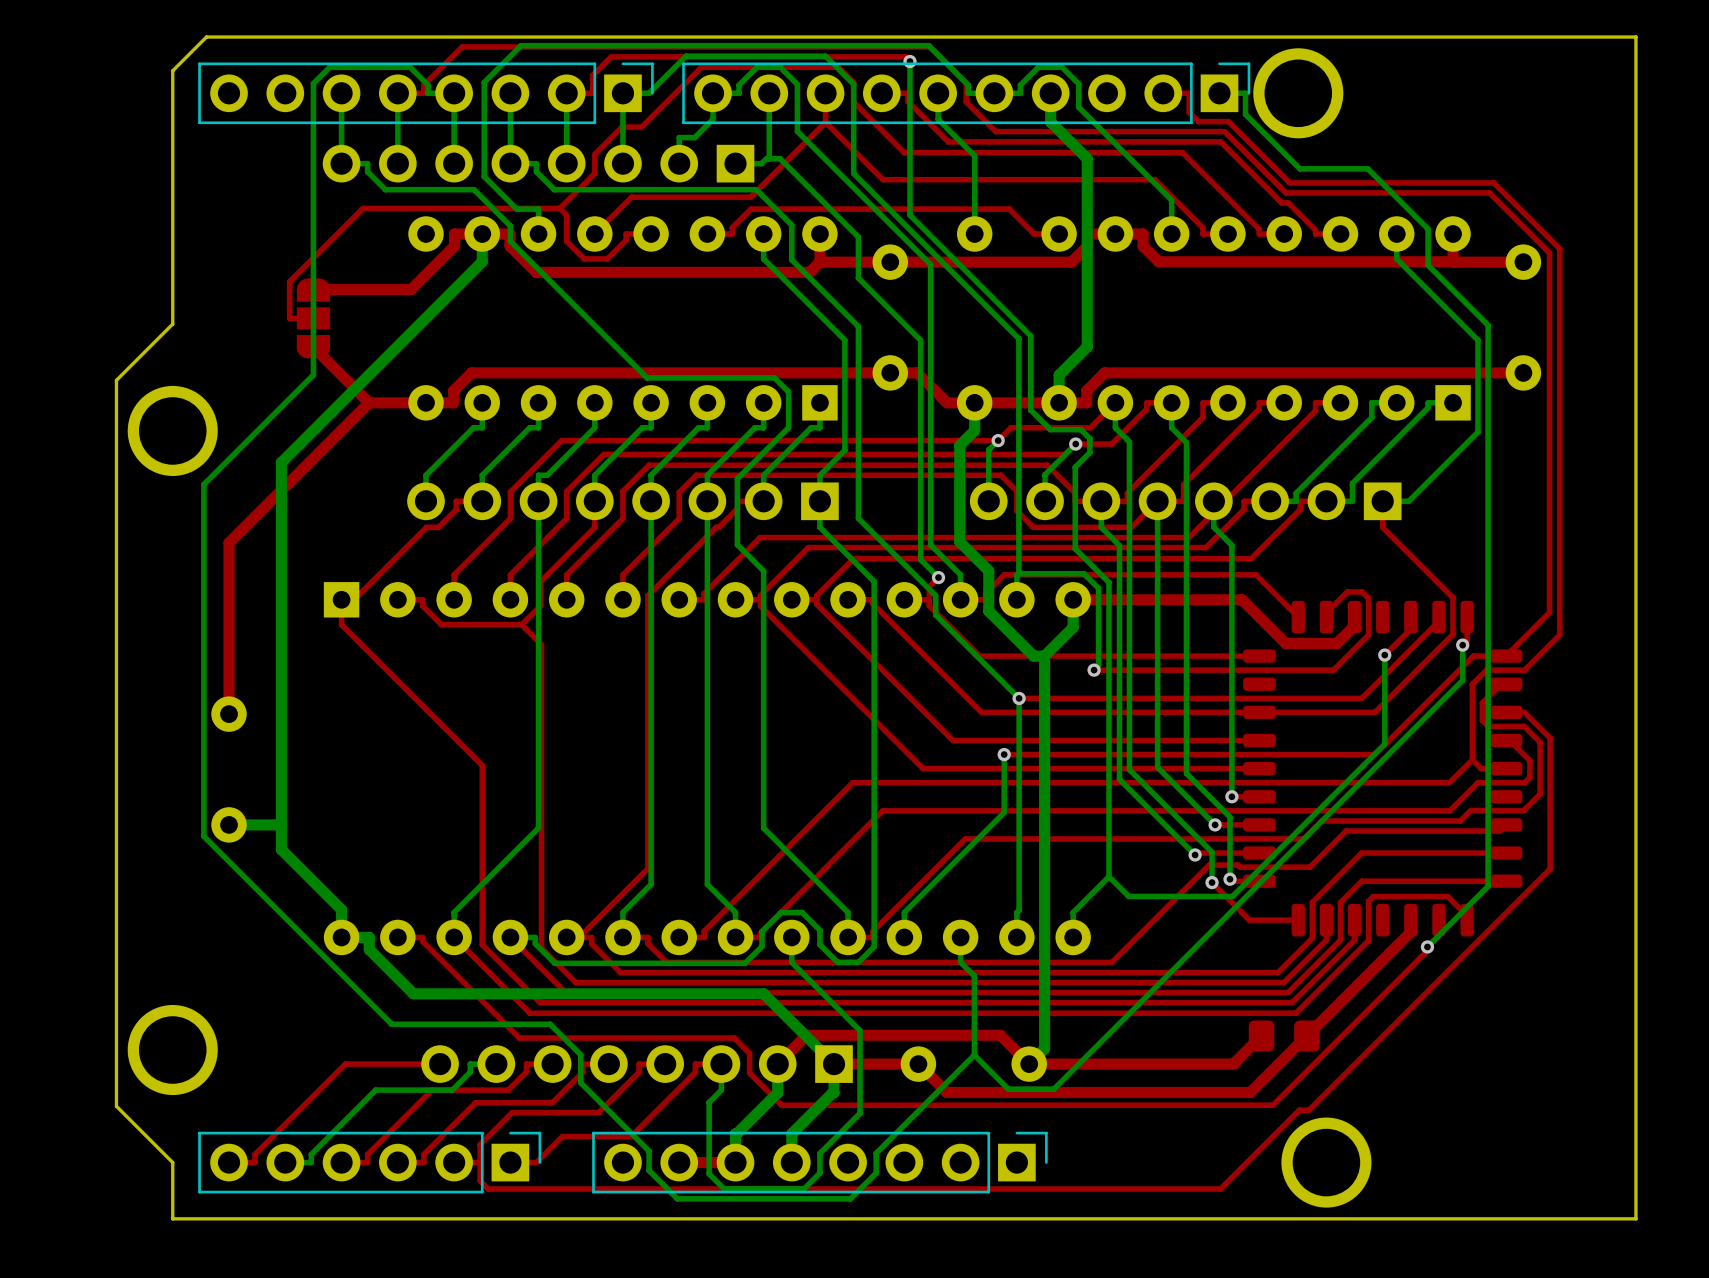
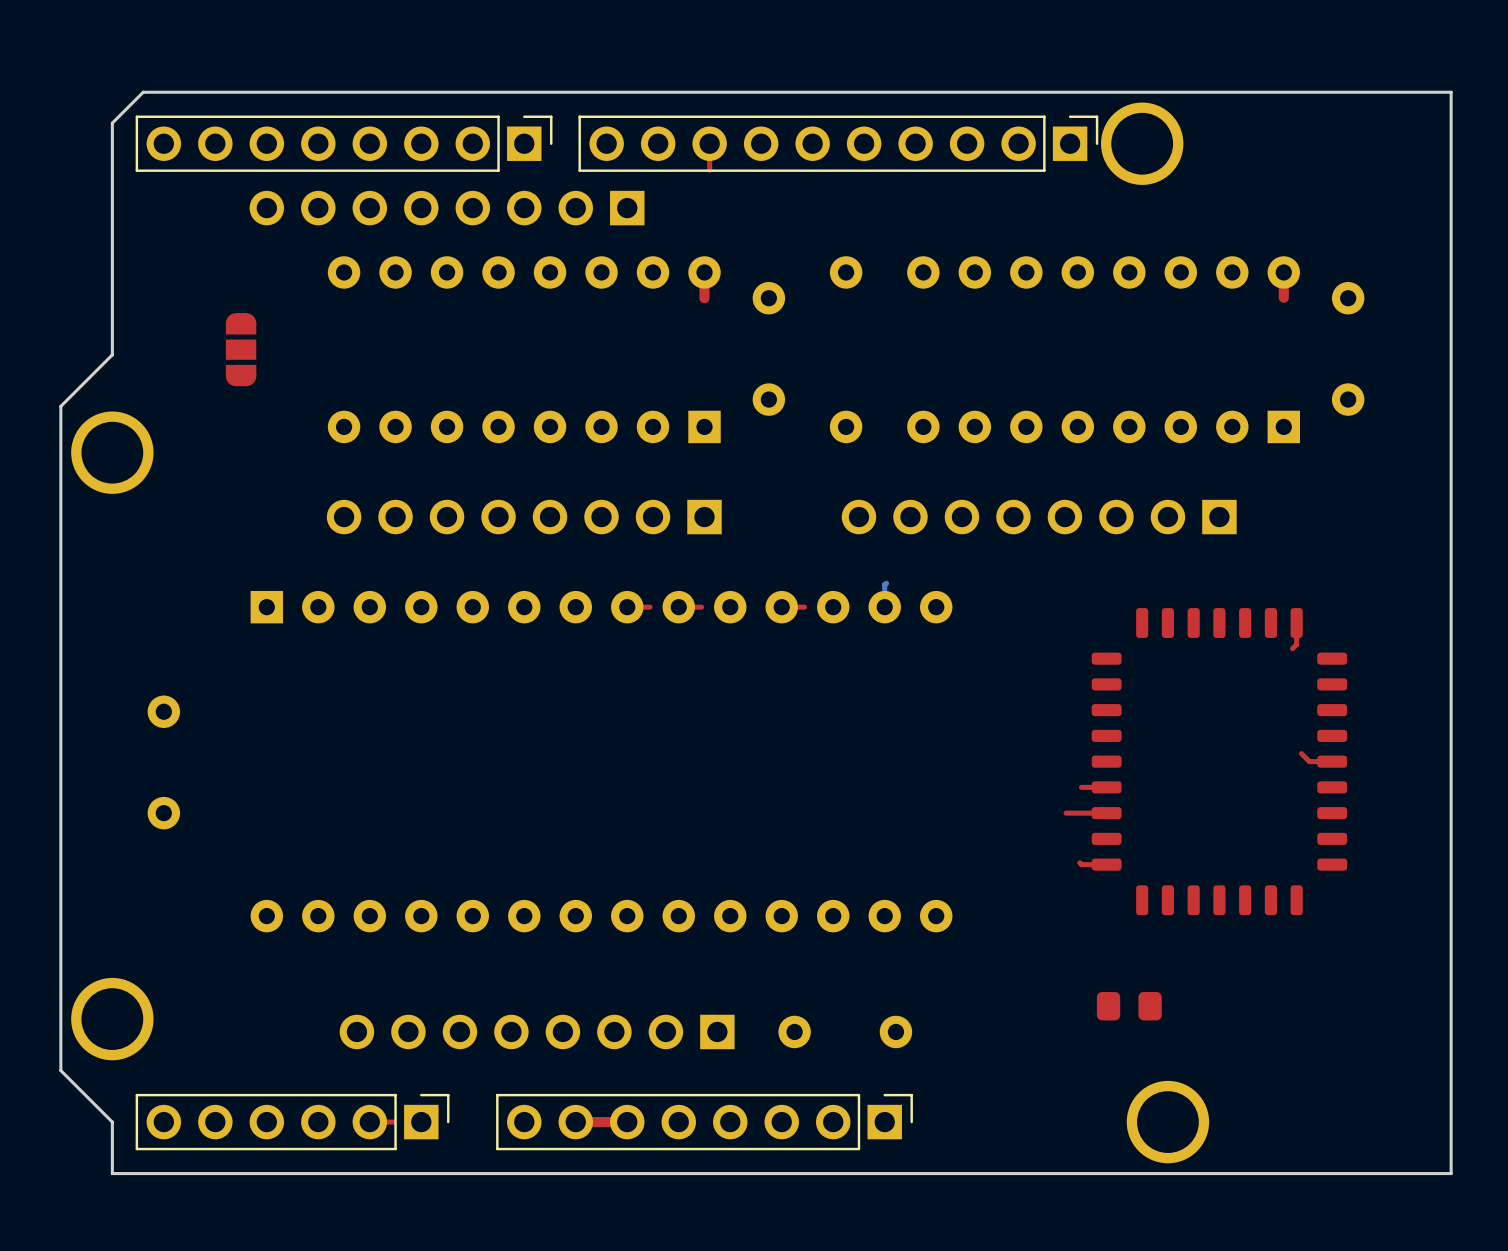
bottom track: (909, 61) (909, 215) (1030, 335) (1030, 410) (1050, 429) (1080, 429) (1089, 438) (1089, 452) (1075, 467) (1075, 548) (1109, 582) (1109, 876) -> none
top track: (909, 61) (905, 56) (611, 56) (592, 75) (592, 93) (566, 93) -> none
via: (909, 61) -> none
bottom track: (341, 93) (341, 163) (367, 163) (367, 171) (385, 189) (474, 189) (510, 226) (510, 241) (647, 377) (774, 377) (788, 391) (788, 427) (737, 478) (737, 544) (763, 570) (763, 828) (848, 912) (848, 937) -> none
bottom track: (397, 93) (397, 163) -> none
top track: (397, 93) (423, 93) (423, 85) (462, 46) (929, 46) (966, 83) (966, 102) (995, 131) (1224, 131) (1285, 192) (1489, 192) (1549, 252) (1549, 612) (1505, 656) (1473, 656) (1374, 754) (1004, 754) -> none
bottom track: (510, 93) (510, 163) (536, 163) (536, 171) (554, 189) (756, 189) (791, 225) (791, 259) (858, 326) (858, 518) (935, 595) (935, 614) (1019, 698) (1019, 910) (1016, 912) (1016, 937) -> none
bottom track: (566, 93) (566, 163) -> none
bottom track: (769, 93) (769, 158) -> none
top track: (881, 93) (907, 93) (907, 101) (948, 141) (1220, 141) (1281, 202) (1288, 202) (1315, 230) (1315, 233) (1340, 233) -> none
bottom track: (938, 93) (938, 119) (974, 155) (974, 233) -> none
bottom track: (1050, 93) (1050, 122) (1087, 158) (1087, 346) (1059, 375) (1059, 402) -> none
top track: (1163, 93) (1189, 93) (1189, 112) (1198, 121) (1228, 121) (1289, 182) (1493, 182) (1559, 248) (1559, 635) (1524, 670) (1486, 670) (1472, 684) (1472, 759) (1449, 782) (852, 782) (704, 931) (704, 937) (679, 937) -> none
bottom track: (1219, 93) (1245, 93) (1245, 114) (1299, 168) (1367, 168) (1428, 229) (1428, 265) (1488, 325) (1488, 886) (1427, 946) -> none
bottom track: (454, 163) (454, 93) (428, 93) (428, 85) (410, 67) (329, 67) (313, 83) (313, 375) (203, 484) (203, 836) (391, 1024) (550, 1024) (580, 1054) (580, 1082) (649, 1151) (649, 1170) (677, 1198) (850, 1198) (876, 1173) (876, 1153) (974, 1055) -> none
bottom track: (622, 163) (622, 93) (649, 93) (686, 56) (825, 56) (853, 84) (853, 173) (1018, 338) (1018, 573) (1083, 573) (1098, 588) (1098, 665) (1094, 670) -> none
bottom track: (679, 163) (679, 137) (694, 137) (713, 119) (713, 93) (739, 93) (739, 85) (756, 67) (780, 67) (797, 84) (797, 131) (930, 264) (930, 544) (960, 574) (960, 599) -> none
bottom track: (735, 163) (761, 163) (766, 158) (780, 158) (858, 237) (858, 278) (920, 340) (920, 559) (938, 577) -> none
top track: (559, 208) (594, 173) (594, 154) (622, 127) (641, 127) (701, 67) (838, 67) (853, 82) (853, 102) (904, 152) (1182, 152) (1259, 229) (1259, 233) (1284, 233) -> none
top track: (559, 208) (362, 208) (289, 281) (289, 318) (313, 318) -> none
top track: (559, 208) (566, 215) (566, 241) (584, 258) (607, 258) (626, 240) (626, 233) (651, 233) -> none
bottom track: (482, 233) (482, 261) (281, 462) (281, 849) (341, 909) (341, 937) (369, 937) (369, 949) (413, 993) (763, 993) (834, 1064) (834, 1092) (791, 1133) (791, 1162) -> none
bottom track: (763, 233) (763, 258) (844, 340) (844, 450) (819, 475) (819, 527) (874, 581) (874, 946) (858, 962) (837, 962) (819, 944) (819, 930) (802, 912) (781, 912) (762, 931) (762, 946) (745, 963) (554, 963) (535, 943) (535, 937) (510, 937) -> none
top track: (1059, 233) (1034, 233) (1009, 209) (751, 209) (732, 227) (732, 233) (707, 233) -> none
bottom track: (1171, 233) (1171, 200) (1078, 107) (1078, 83) (1062, 67) (1038, 67) (1020, 85) (1020, 93) (968, 93) (968, 85) (928, 45) (521, 45) (484, 82) (484, 176) (516, 209) (538, 209) (538, 233) -> none
top track: (1227, 233) (1203, 233) (1203, 227) (1154, 179) (883, 179) (825, 122) (750, 197) (631, 197) (594, 233) -> none
bottom track: (1396, 233) (1396, 258) (1477, 340) (1477, 432) (1408, 501) (1382, 501) -> none
top track: (1523, 262) (1158, 261) (1143, 246) (1143, 233) (1087, 233) (1087, 246) (1071, 262) (819, 262) (809, 272) (536, 272) (509, 246) (509, 233) (454, 233) (454, 246) (411, 289) (313, 289) -> none
top track: (313, 347) (369, 402) -> none
top track: (1523, 372) (1104, 372) (1086, 390) (1086, 402) (946, 402) (917, 372) (471, 372) (453, 390) (453, 402) (369, 402) -> none
top track: (369, 402) (229, 542) (229, 714) -> none
bottom track: (482, 402) (482, 427) (473, 427) (425, 475) (425, 501) -> none
bottom track: (538, 402) (538, 427) (529, 427) (482, 475) (482, 501) -> none
bottom track: (594, 402) (594, 427) (547, 475) (538, 475) (538, 828) (454, 912) (454, 937) -> none
bottom track: (651, 402) (651, 427) (642, 427) (594, 475) (594, 501) -> none
bottom track: (707, 402) (707, 427) (698, 427) (651, 475) (651, 884) (622, 912) (622, 937) -> none
bottom track: (763, 402) (763, 427) (754, 427) (707, 475) (707, 884) (735, 912) (735, 937) -> none
bottom track: (819, 402) (819, 427) (811, 427) (763, 475) (763, 501) -> none
bottom track: (974, 402) (974, 430) (959, 445) (959, 541) (988, 570) (988, 611) (1033, 656) (1044, 656) -> none
bottom track: (1115, 402) (1115, 427) (1129, 441) (1129, 769) (1212, 852) (1212, 882) -> none
top track: (1115, 402) (1090, 427) (1011, 427) (998, 440) (561, 440) (510, 491) (510, 518) (454, 574) (454, 599) -> none
bottom track: (1171, 402) (1171, 427) (1186, 442) (1186, 773) (1230, 817) (1230, 879) -> none
top track: (1171, 402) (1146, 402) (1146, 409) (1111, 444) (1075, 444) (1065, 454) (603, 454) (566, 491) (566, 518) (510, 574) (510, 599) -> none
top track: (1227, 402) (1203, 402) (1203, 417) (1127, 493) (1127, 501) (1075, 501) (1075, 493) (1047, 465) (648, 465) (622, 491) (622, 518) (566, 574) (566, 599) -> none
top track: (1284, 402) (1259, 402) (1259, 409) (1183, 484) (1183, 501) (1157, 501) (1131, 527) (1033, 527) (1016, 510) (1016, 491) (1000, 475) (696, 475) (679, 492) (679, 518) (622, 574) (622, 599) -> none
top track: (1340, 402) (1315, 402) (1315, 410) (1188, 537) (760, 537) (704, 593) (704, 599) (679, 599) -> none
bottom track: (1396, 402) (1371, 402) (1371, 417) (1296, 493) (1296, 501) (1270, 501) -> none
bottom track: (1453, 402) (1428, 402) (1428, 407) (1352, 483) (1352, 501) (1326, 501) -> none
bottom track: (998, 440) (988, 450) (988, 501) -> none
via: (998, 440) -> none
bottom track: (1075, 444) (1045, 474) (1045, 501) -> none
via: (1075, 444) -> none
top track: (482, 501) (456, 501) (456, 509) (438, 527) (426, 527) (354, 599) (341, 599) (341, 624) (482, 765) (482, 944) (540, 1002) (1292, 1002) (1354, 940) (1354, 920) -> none
top track: (594, 501) (594, 527) (540, 581) (540, 605) (521, 624) -> none
top track: (763, 501) (737, 501) (737, 508) (647, 595) (647, 868) (579, 937) -> none
bottom track: (1101, 501) (1101, 527) (1119, 545) (1119, 779) (1195, 854) -> none
bottom track: (1157, 501) (1157, 767) (1215, 824) -> none
bottom track: (1213, 501) (1213, 527) (1231, 545) (1231, 796) -> none
top track: (1270, 501) (1244, 501) (1244, 509) (1205, 547) (808, 547) (760, 595) (760, 606) (923, 768) (1259, 768) -> none
top track: (1326, 501) (1300, 501) (1300, 509) (1251, 558) (853, 558) (816, 595) (816, 604) (952, 740) (1259, 740) -> none
top track: (1382, 501) (1382, 527) (1453, 597) (1453, 634) (1375, 712) (981, 712) (873, 603) (873, 599) (848, 599) -> none
top track: (938, 577) (929, 586) (929, 605) (979, 656) (1259, 656) -> none
via: (938, 577) -> none
top track: (397, 599) (422, 599) (422, 606) (441, 624) (521, 624) -> none
top track: (960, 599) (985, 599) (985, 593) (1004, 574) (1256, 574) (1298, 617) -> none
bottom track: (1073, 599) (1073, 627) (1044, 656) -> none
top track: (1073, 599) (1242, 599) (1285, 643) (1336, 643) (1354, 625) (1354, 617) -> none
top track: (1326, 617) (1326, 612) (1347, 592) (1362, 592) (1368, 598) (1368, 634) (1333, 670) (1094, 670) -> none
top track: (1410, 617) (1410, 629) (1384, 655) -> none
top track: (1438, 617) (1438, 621) (1361, 698) (1019, 698) -> none
top track: (521, 624) (541, 644) (541, 948) (576, 982) (1283, 982) (1326, 940) (1326, 920) -> none
bottom track: (1462, 645) (1462, 680) (1053, 1089) (1008, 1089) (974, 1055) -> none
via: (1462, 645) -> none
bottom track: (1384, 655) (1384, 744) (1232, 896) (1128, 896) (1109, 876) -> none
via: (1384, 655) -> none
bottom track: (1044, 656) (1044, 1048) (1029, 1064) -> none
via: (1094, 670) -> none
top track: (1505, 684) (1501, 684) (1482, 702) (1482, 720) (1488, 726) (1524, 726) (1540, 742) (1540, 794) (1523, 810) (1470, 810) (1460, 821) (1321, 821) (1303, 838) (965, 838) (873, 931) (873, 937) (848, 937) -> none
via: (1019, 698) -> none
top track: (1505, 712) (1524, 712) (1550, 738) (1550, 868) (1308, 1110) (1299, 1110) (1220, 1189) (488, 1189) (480, 1180) (480, 1144) (512, 1112) (598, 1112) (639, 1072) (639, 1064) (665, 1064) -> none
top track: (1505, 740) (1509, 740) (1529, 760) (1529, 777) (1524, 782) (1478, 782) (1449, 810) (882, 810) (760, 933) (760, 937) (735, 937) -> none
bottom track: (1004, 754) (1004, 812) (904, 912) (904, 937) -> none
via: (1004, 754) -> none
via: (1231, 796) -> none
bottom track: (281, 824) (229, 824) -> none
via: (1215, 824) -> none
top track: (1505, 824) (1499, 831) (1346, 831) (1310, 867) (1209, 865) (1111, 962) (666, 962) (647, 943) (647, 937) (622, 937) -> none
top track: (1259, 853) (1197, 853) (1195, 854) -> none
top track: (1505, 853) (1361, 853) (1312, 902) (1312, 938) (1277, 972) (620, 972) (591, 943) (591, 937) (566, 937) -> none
via: (1195, 854) -> none
bottom track: (1109, 876) (1073, 912) (1073, 937) -> none
via: (1230, 879) -> none
top track: (1505, 881) (1361, 881) (1340, 902) (1340, 940) (1288, 992) (565, 992) (510, 937) -> none
top track: (1212, 882) (1249, 920) (1298, 920) -> none
via: (1212, 882) -> none
top track: (1410, 920) (1410, 932) (1250, 1092) (946, 1092) (918, 1064) (834, 1064) -> none
top track: (1438, 920) (1438, 935) (1427, 946) (1427, 950) (1272, 1105) (781, 1105) (749, 1073) (749, 1053) (734, 1038) (519, 1038) (422, 941) (422, 937) (397, 937) -> none
top track: (1467, 920) (1467, 915) (1447, 896) (1373, 896) (1368, 901) (1368, 940) (1295, 1013) (529, 1013) (454, 937) -> none
bottom track: (791, 937) (791, 962) (860, 1030) (860, 1113) (819, 1153) (819, 1173) (804, 1188) (724, 1188) (709, 1173) (709, 1102) (721, 1090) (721, 1064) -> none
bottom track: (960, 937) (960, 962) (974, 976) (974, 1055) -> none
via: (1427, 946) -> none
top track: (1261, 1035) (1233, 1064) (1029, 1064) (1000, 1035) (806, 1035) (777, 1064) -> none
top track: (440, 1064) (345, 1064) (255, 1154) (255, 1162) (229, 1162) -> none
bottom track: (496, 1064) (470, 1064) (470, 1072) (452, 1090) (375, 1090) (311, 1154) (311, 1162) (285, 1162) -> none
top track: (552, 1064) (526, 1064) (526, 1071) (508, 1090) (431, 1090) (367, 1154) (367, 1162) (341, 1162) -> none
top track: (608, 1064) (582, 1064) (582, 1072) (552, 1102) (475, 1102) (423, 1154) (423, 1162) (397, 1162) -> none
top track: (721, 1064) (695, 1064) (695, 1072) (631, 1136) (562, 1136) (536, 1162) (510, 1162) -> none
bottom track: (777, 1064) (777, 1092) (735, 1133) (735, 1162) -> none

